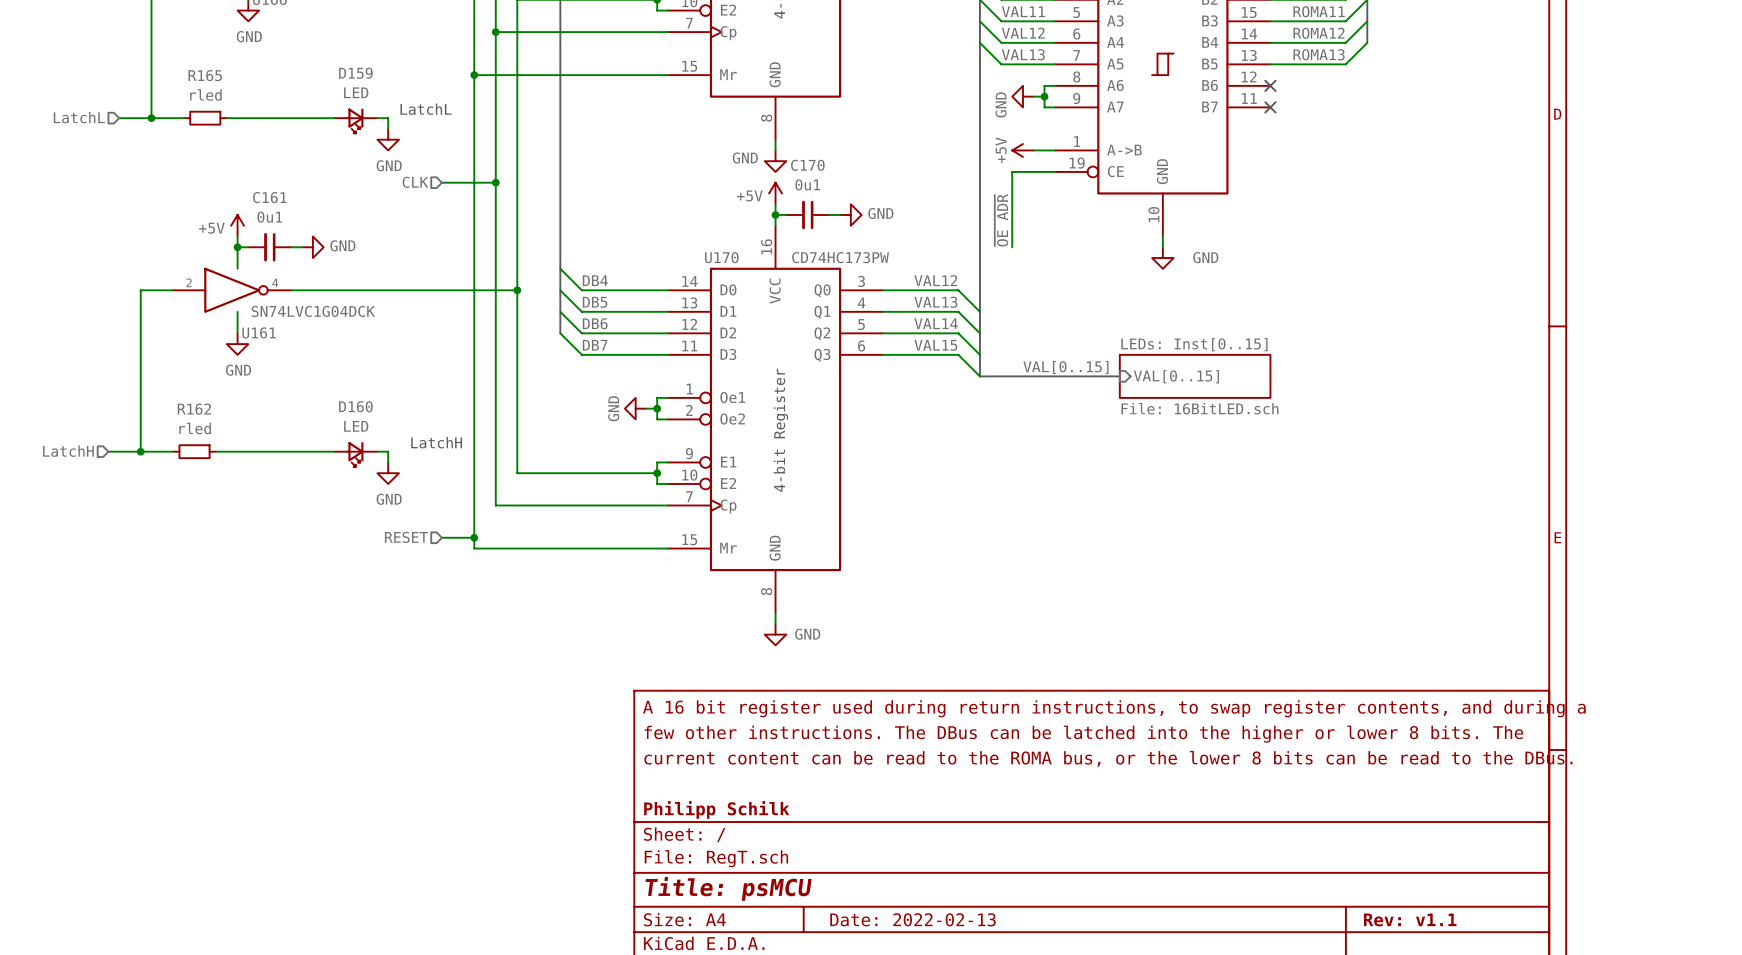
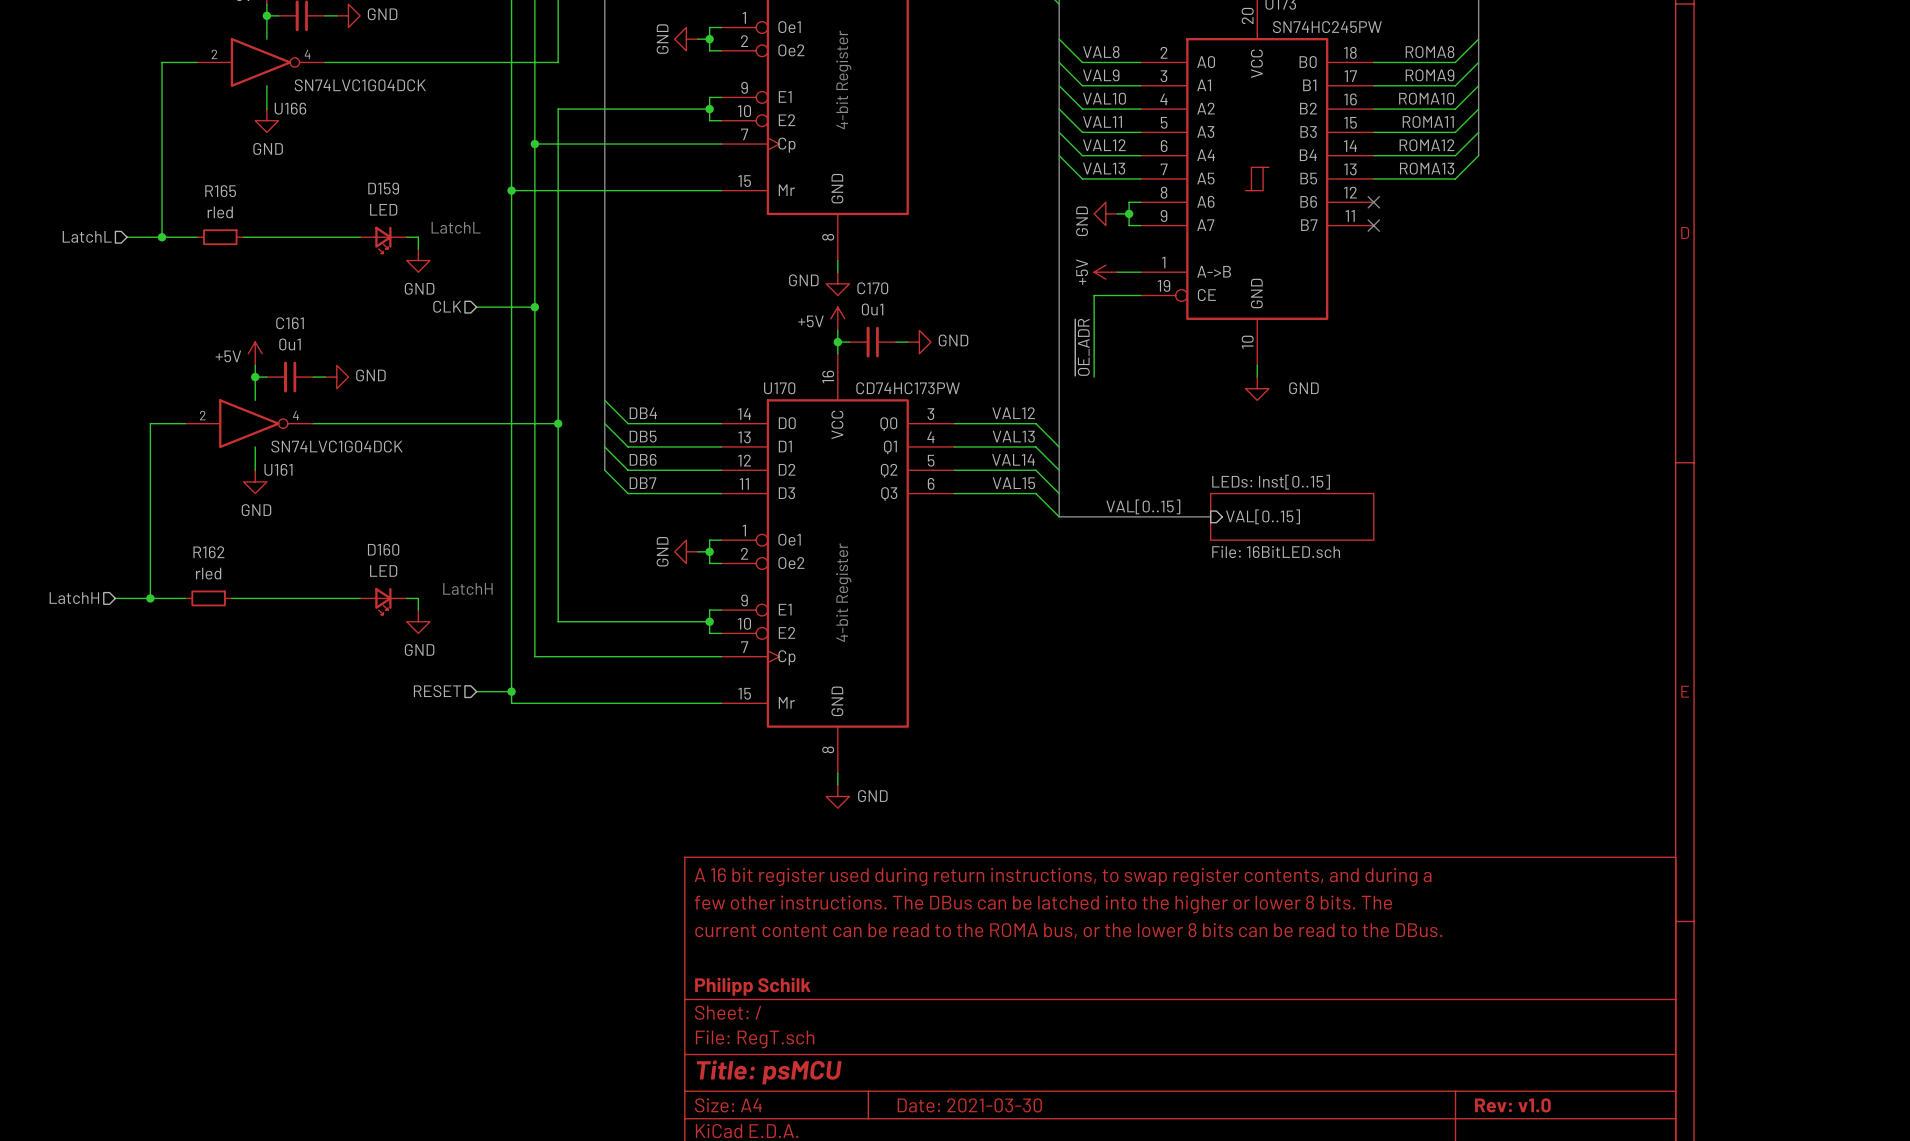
title block: Date: 2022-02-13 (913, 919) -> Date: 2021-03-30 (969, 1105)
title block: Rev: v1.1 (1410, 919) -> Rev: v1.0 (1512, 1105)

